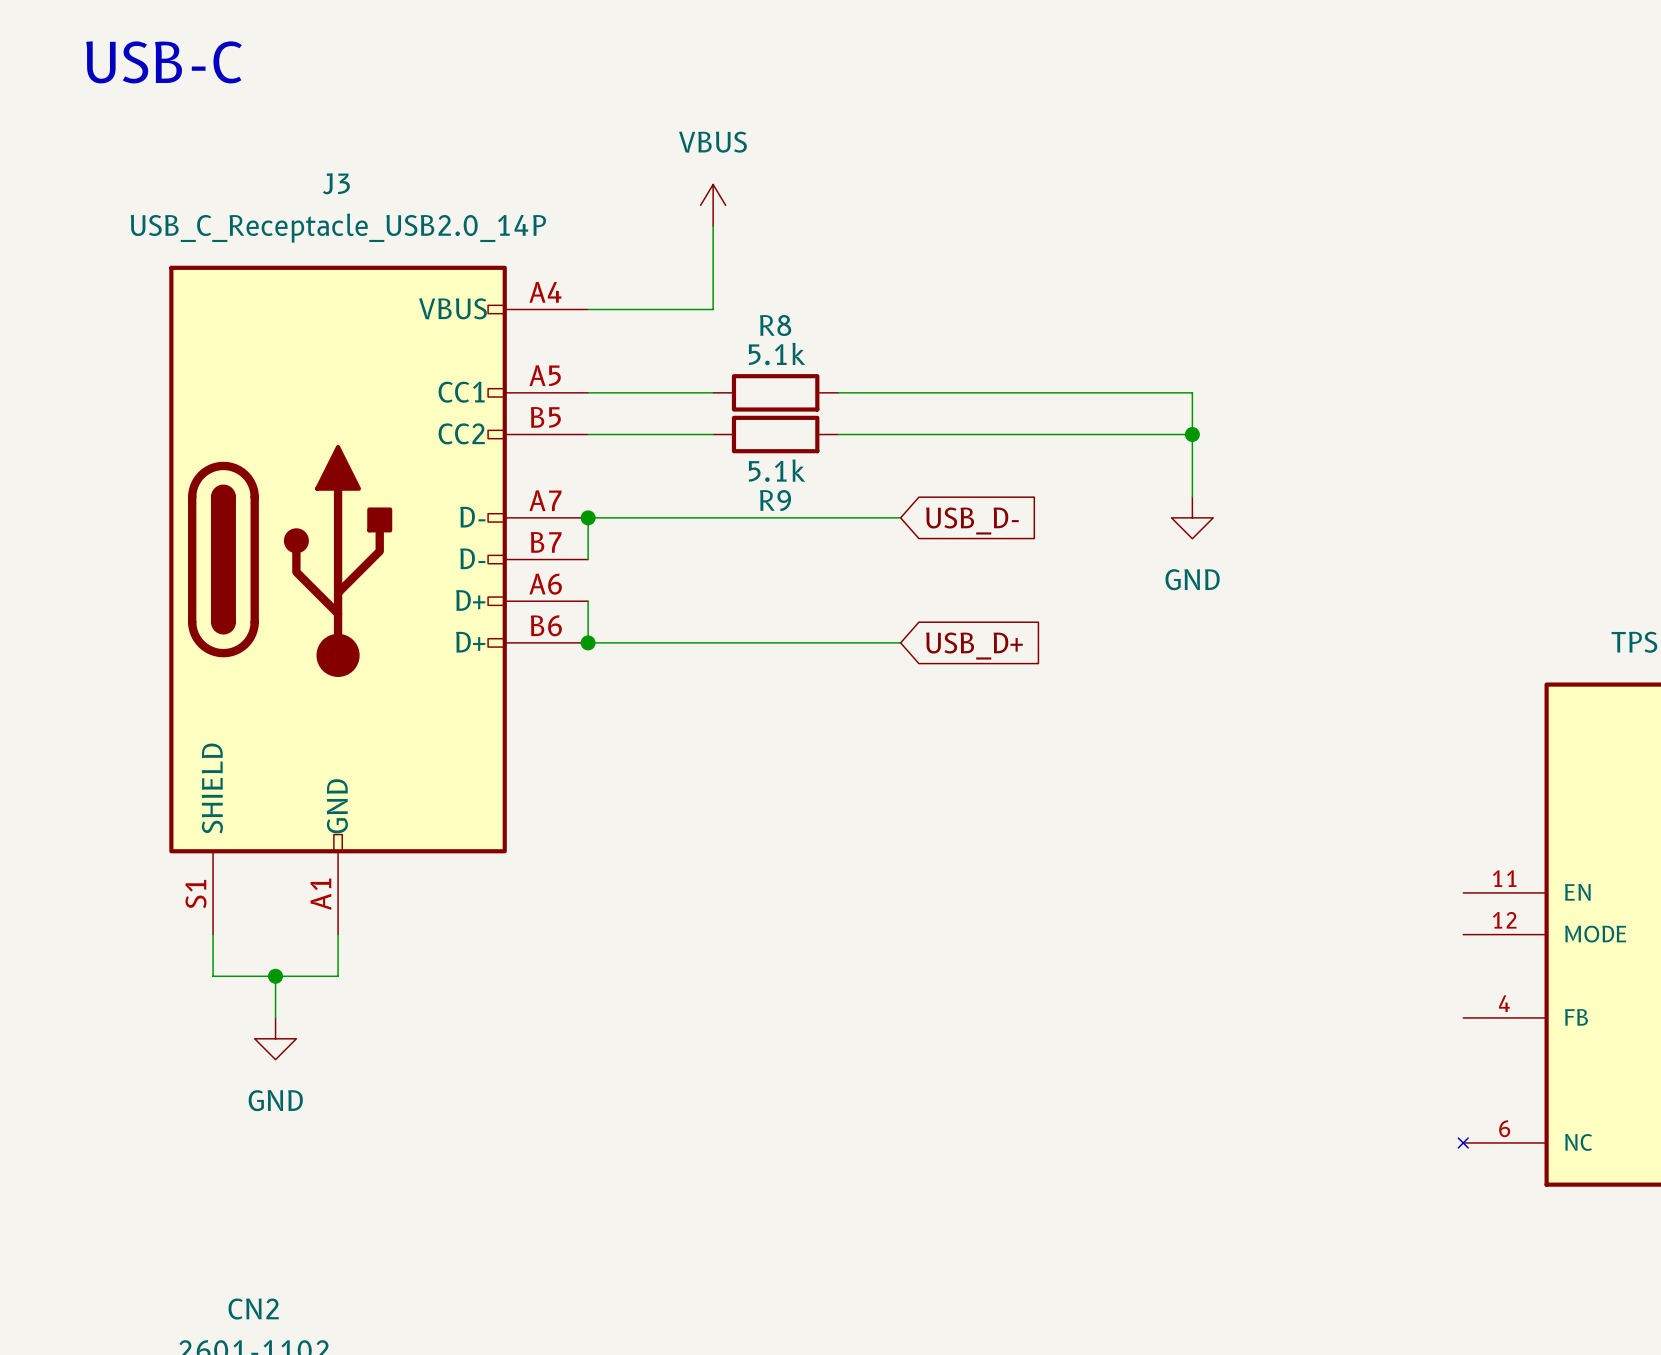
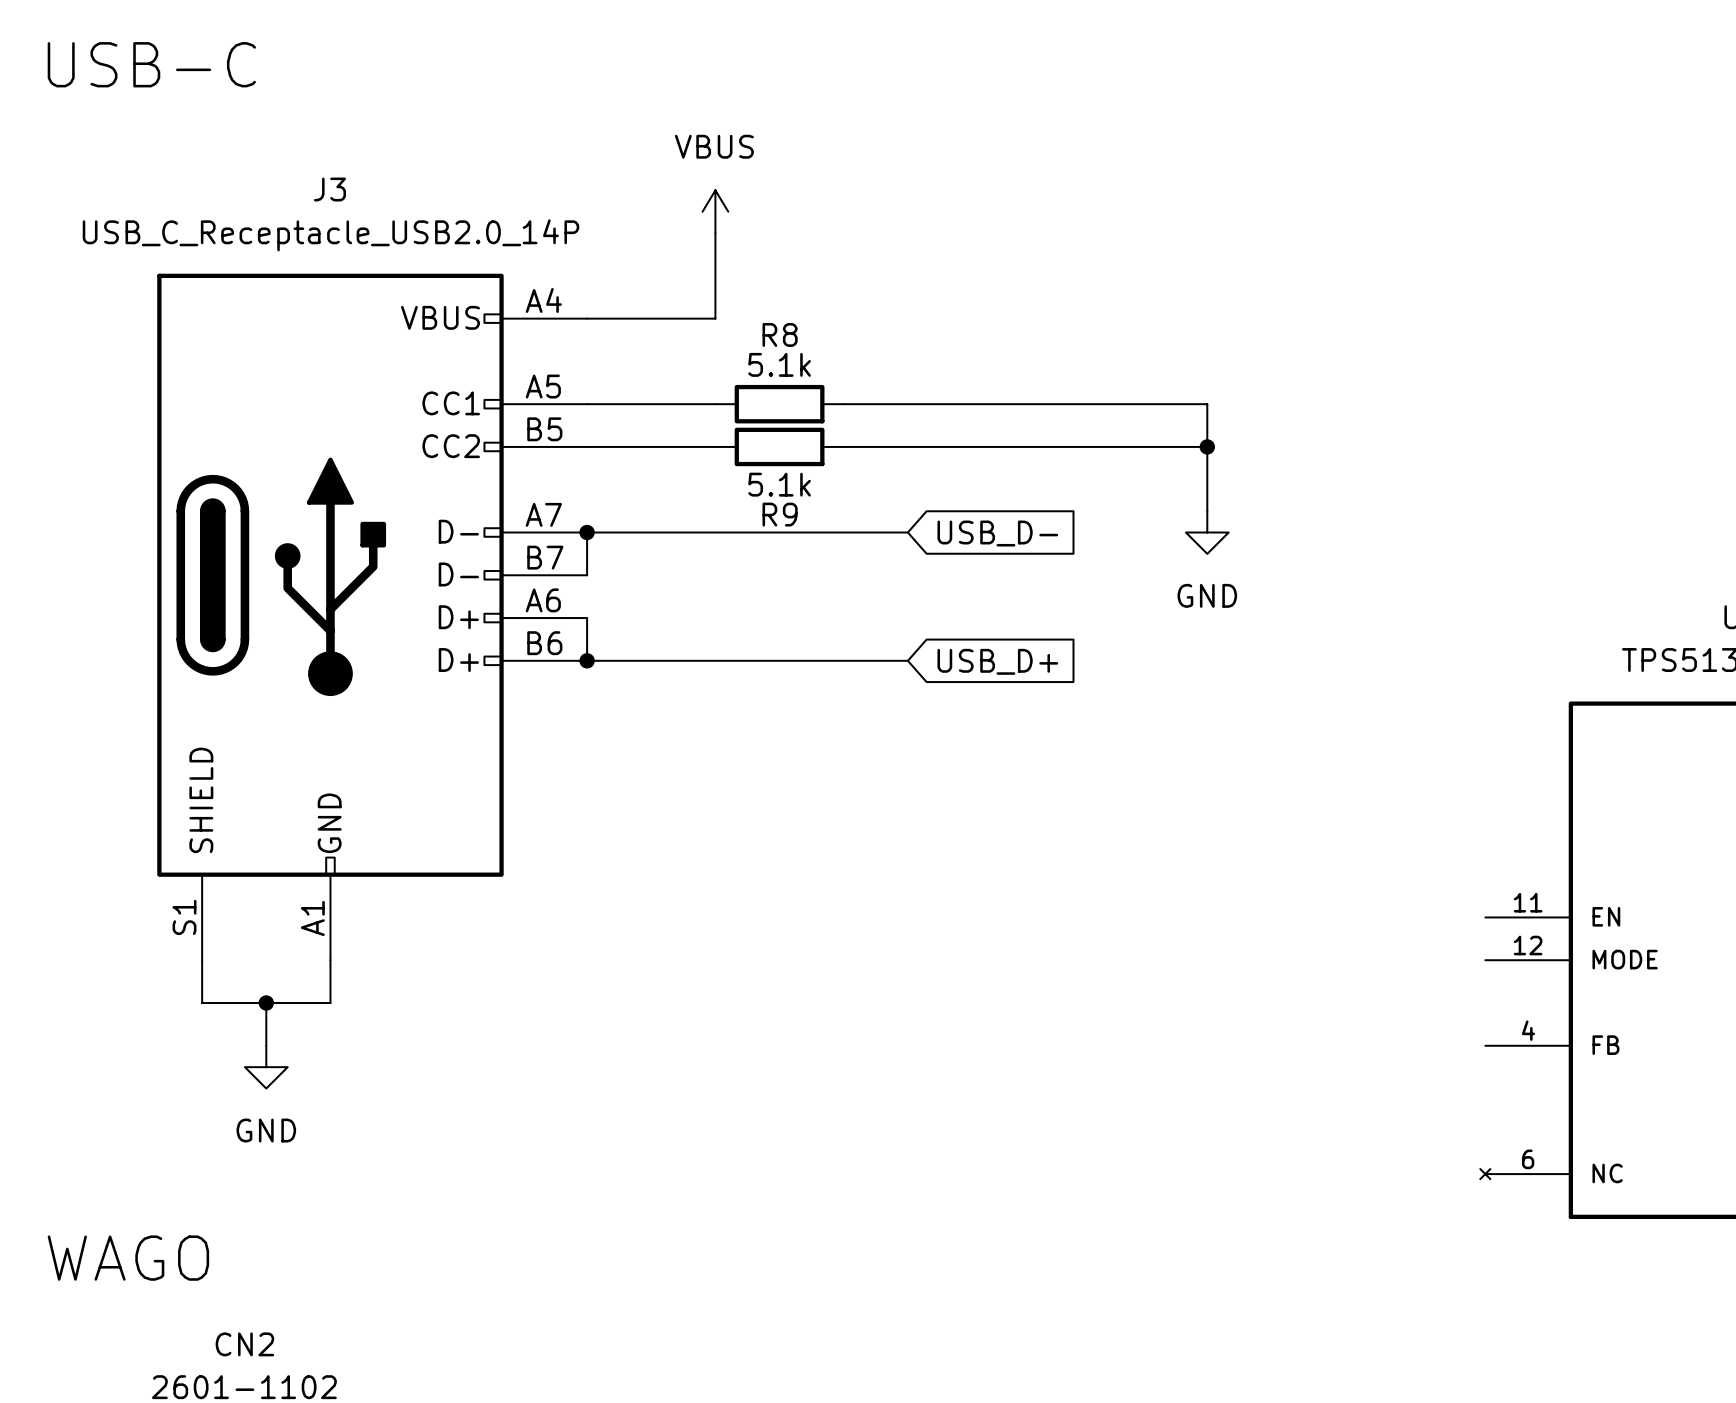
text: none -> WAGO (128, 1258)

